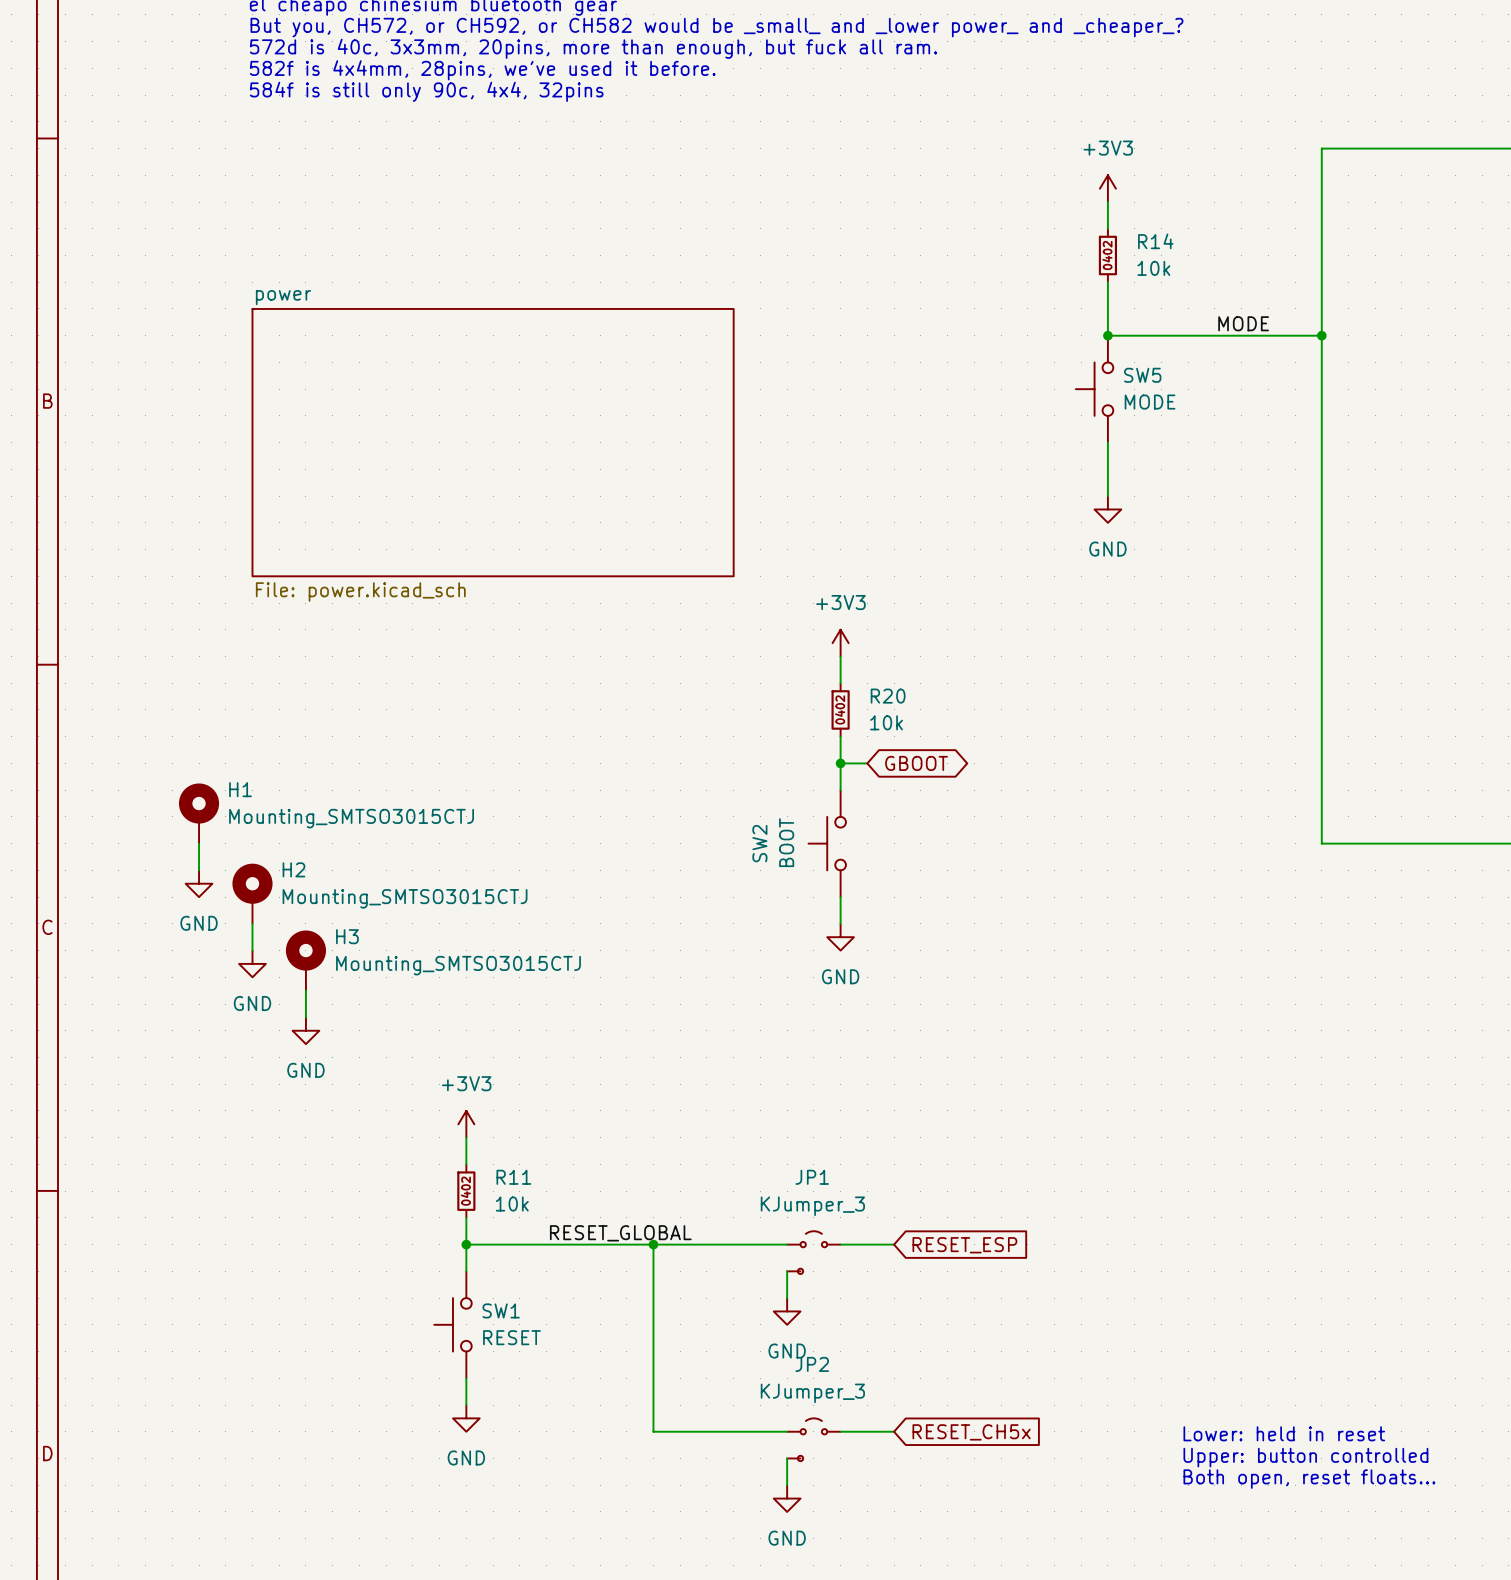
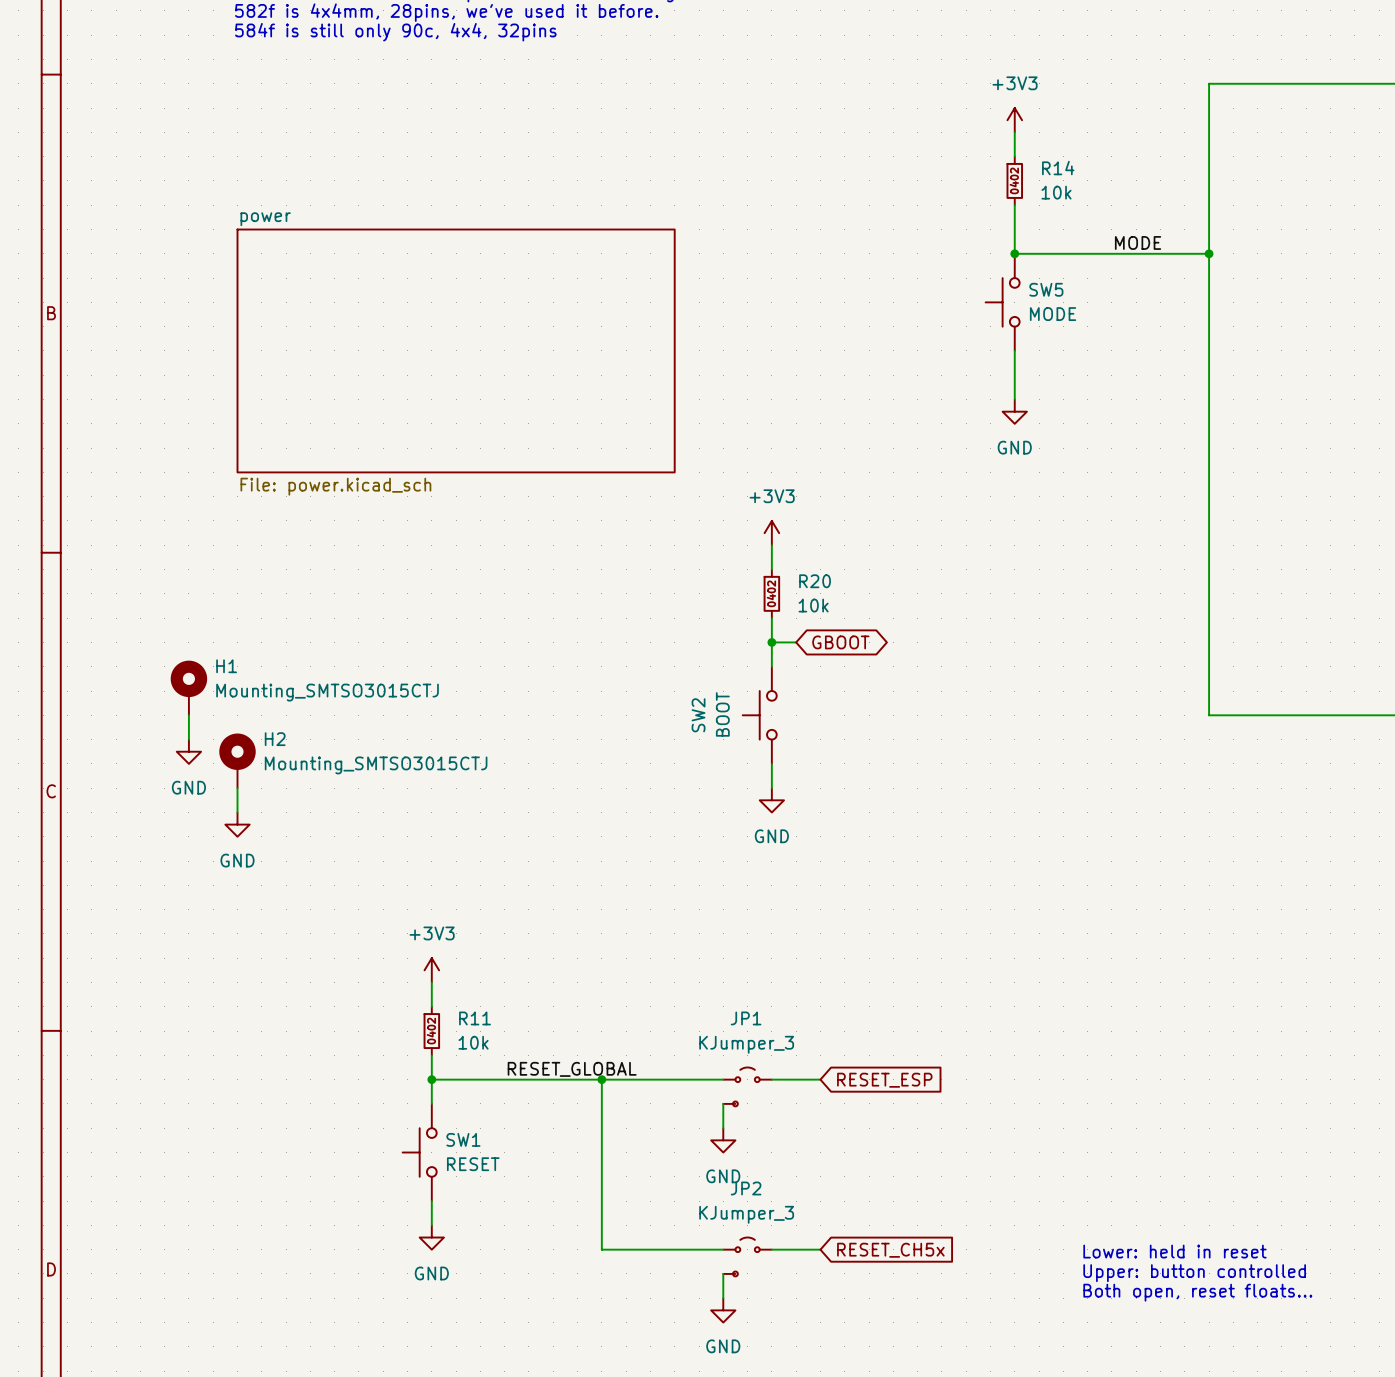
H3: Mounting_SMTSO3015CTJ (305, 960) -> none
wire: (305, 990) (305, 1017) -> none
power symbol: GND (305, 1030) -> none

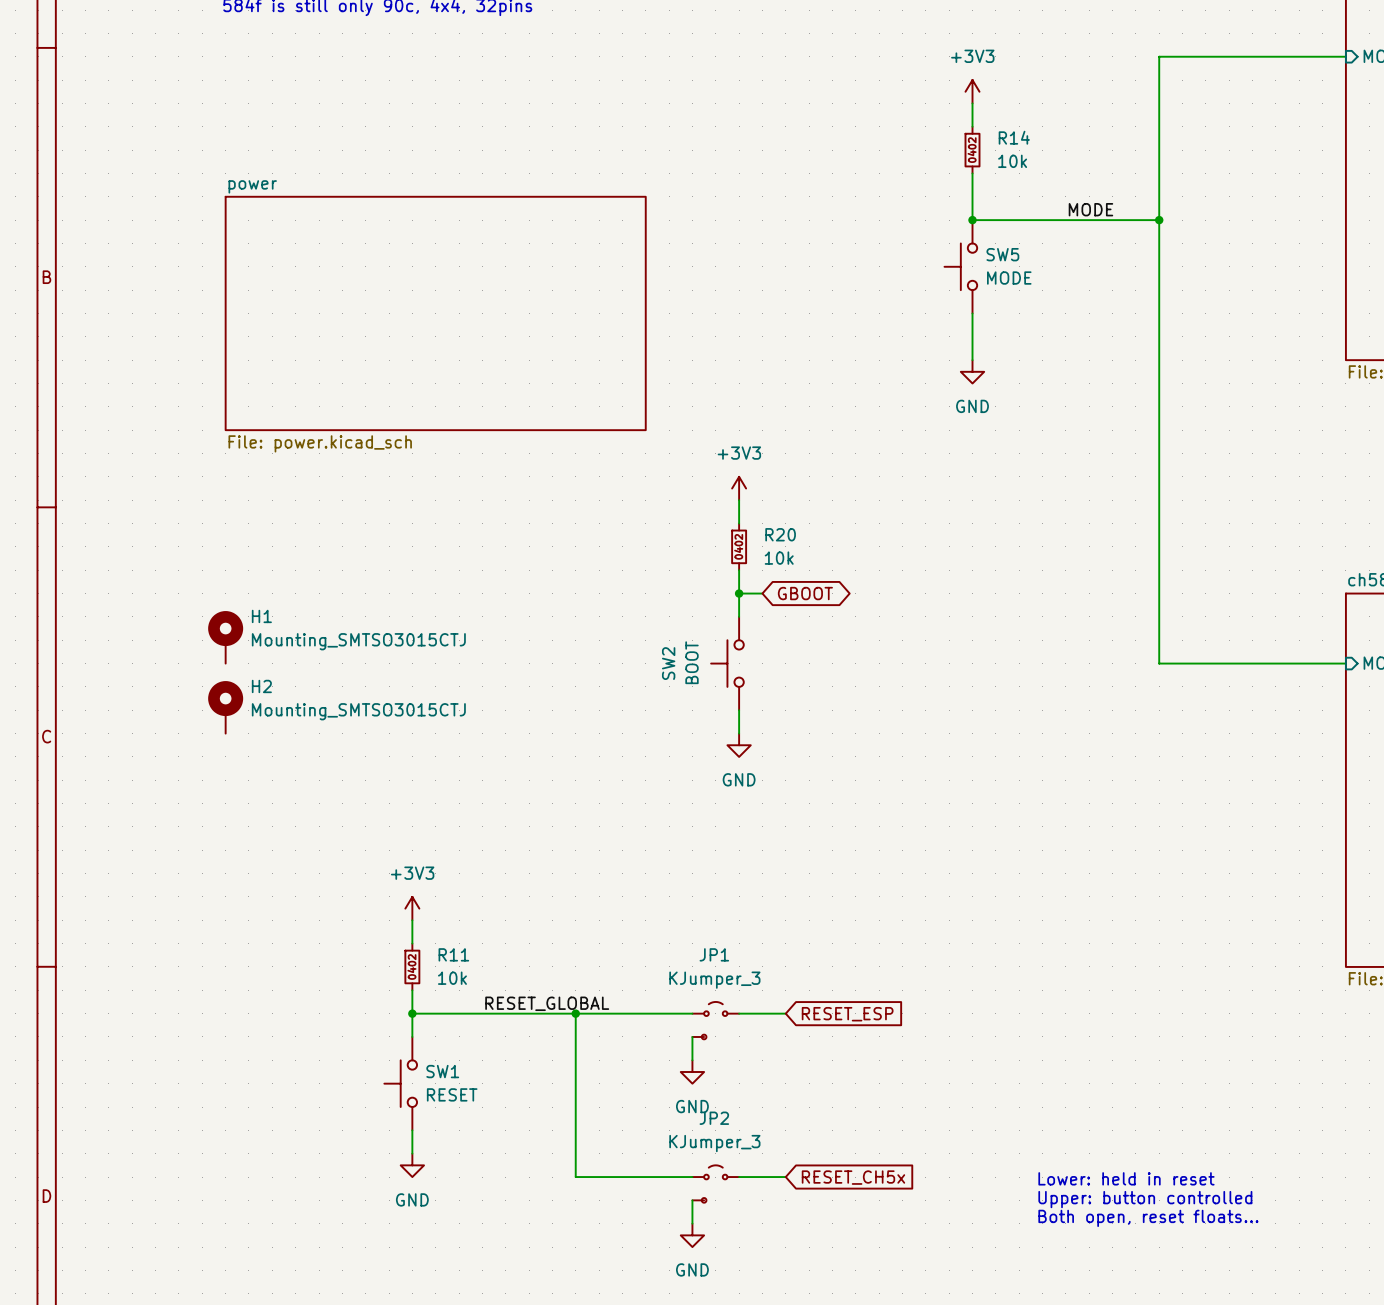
H1 position: (188, 687) -> (225, 637)
wire: (188, 715) (188, 739) -> none
power symbol: GND (188, 751) -> none
wire: (237, 788) (237, 812) -> none
power symbol: GND (237, 824) -> none

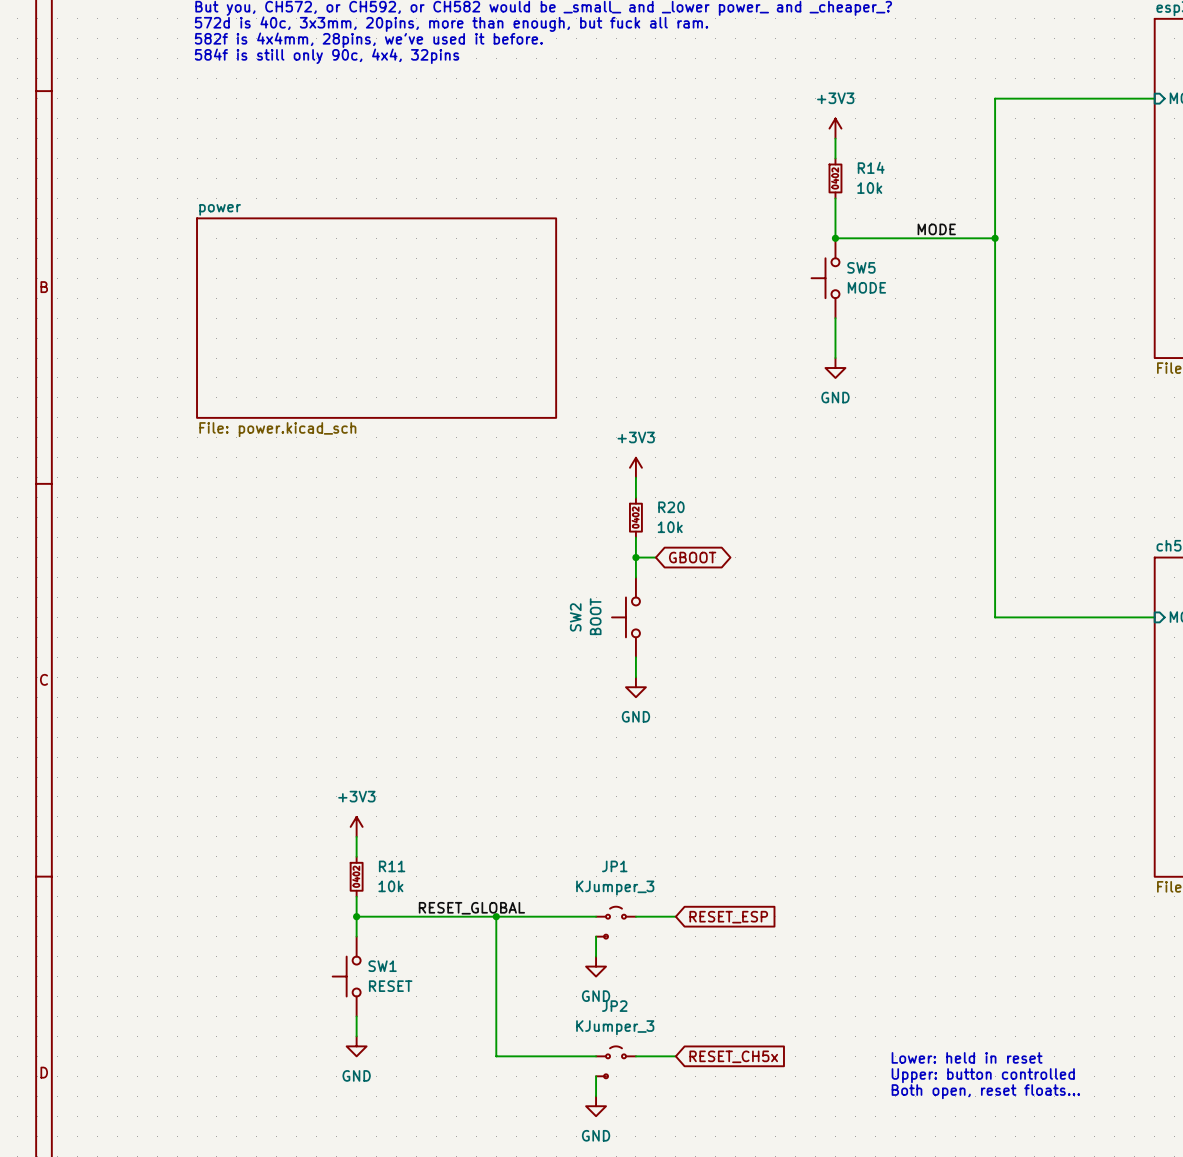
H1: Mounting_SMTSO3015CTJ (225, 637) -> none
H2: Mounting_SMTSO3015CTJ (225, 707) -> none

